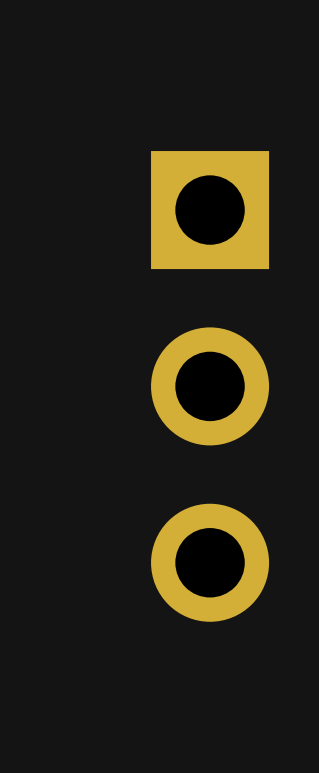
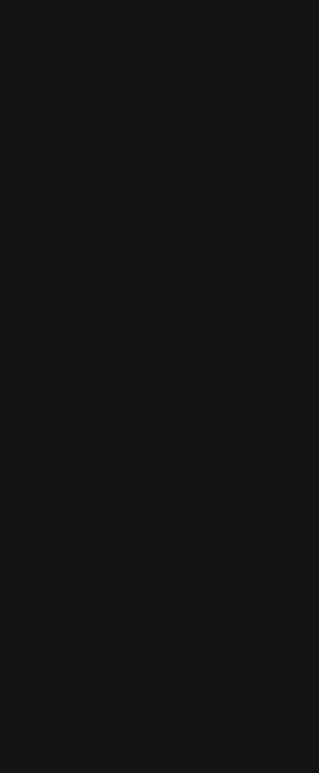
part: (210, 386) -> none

